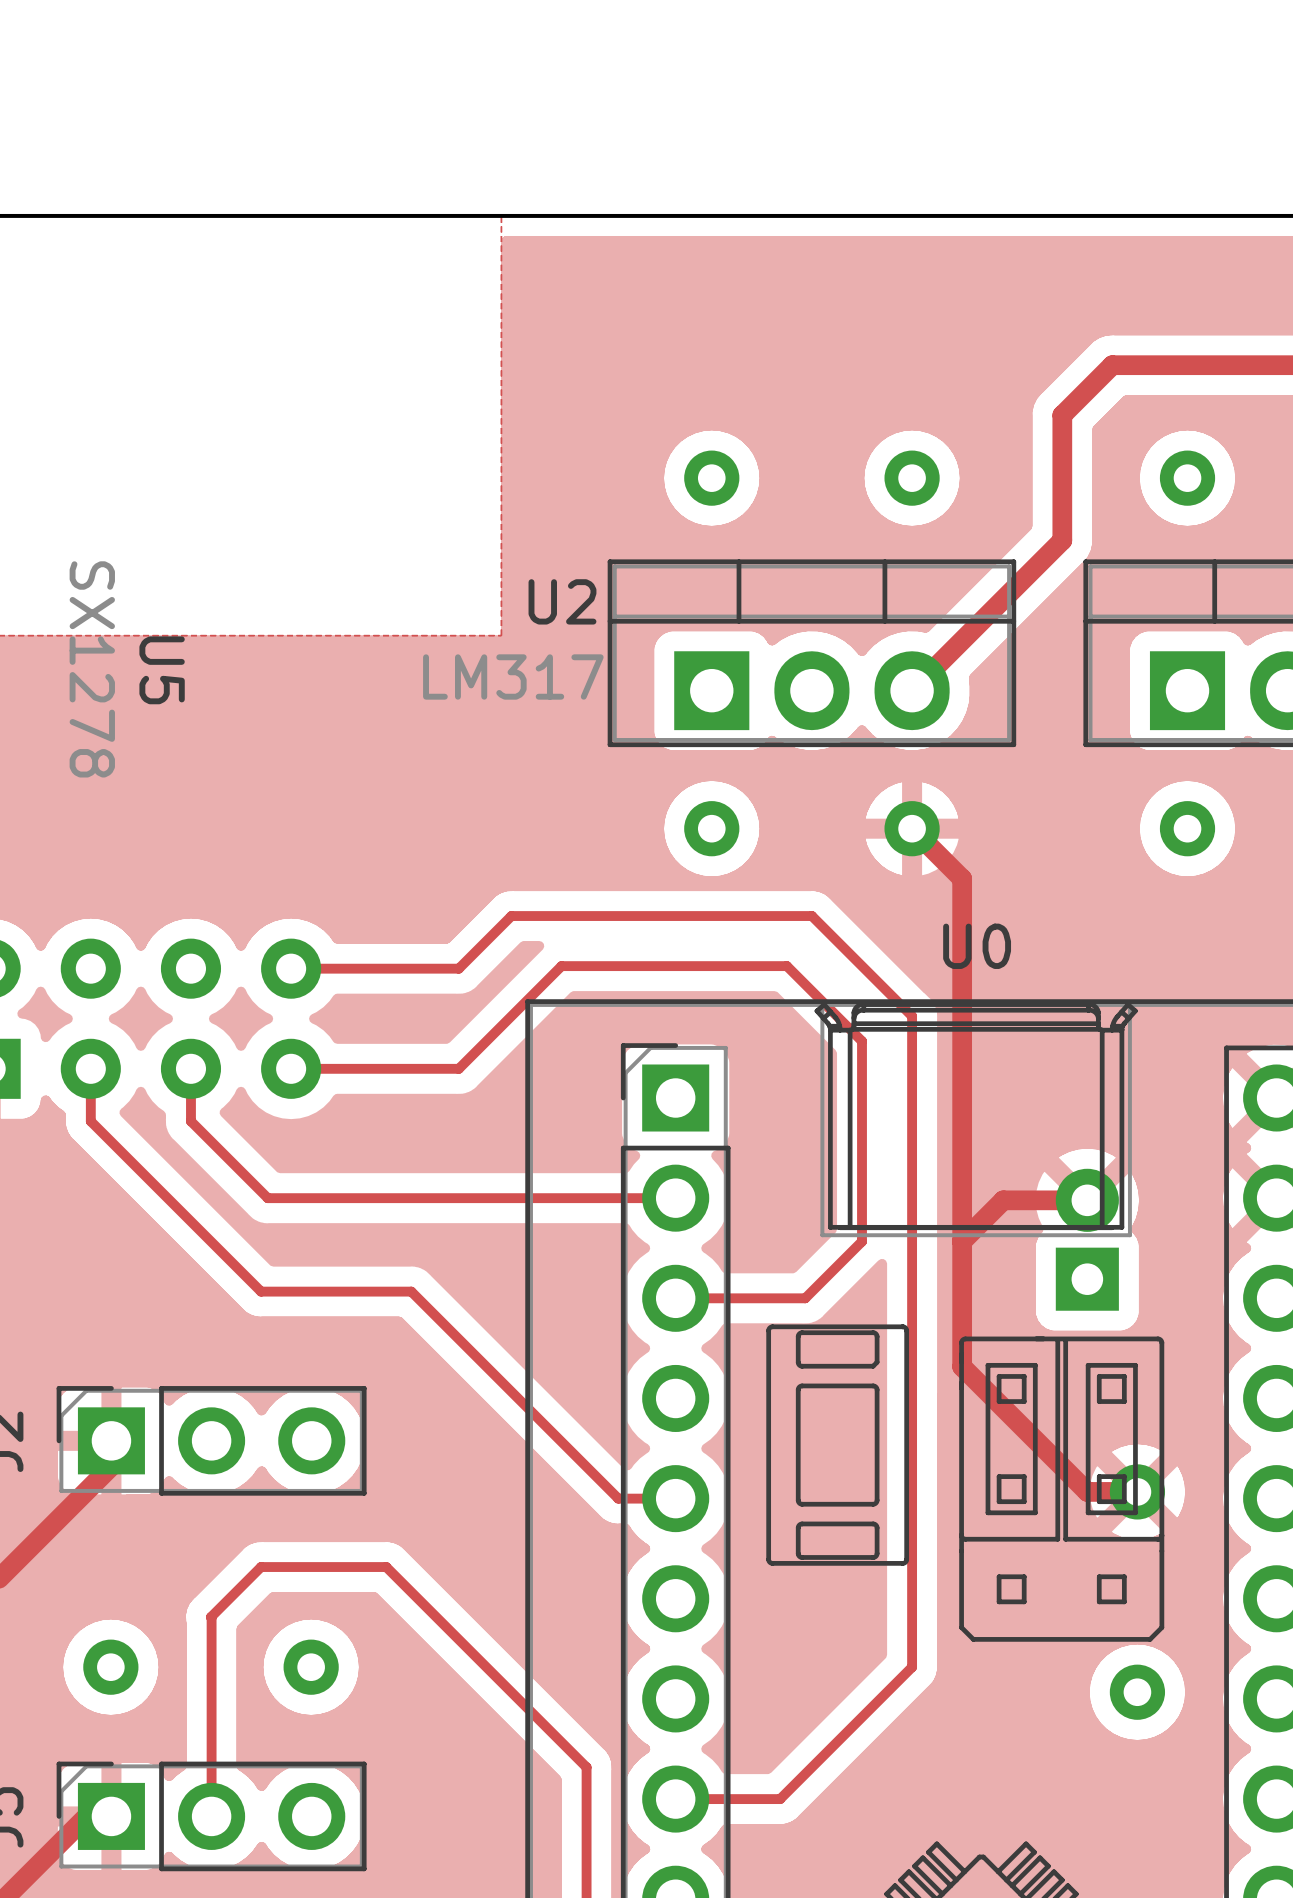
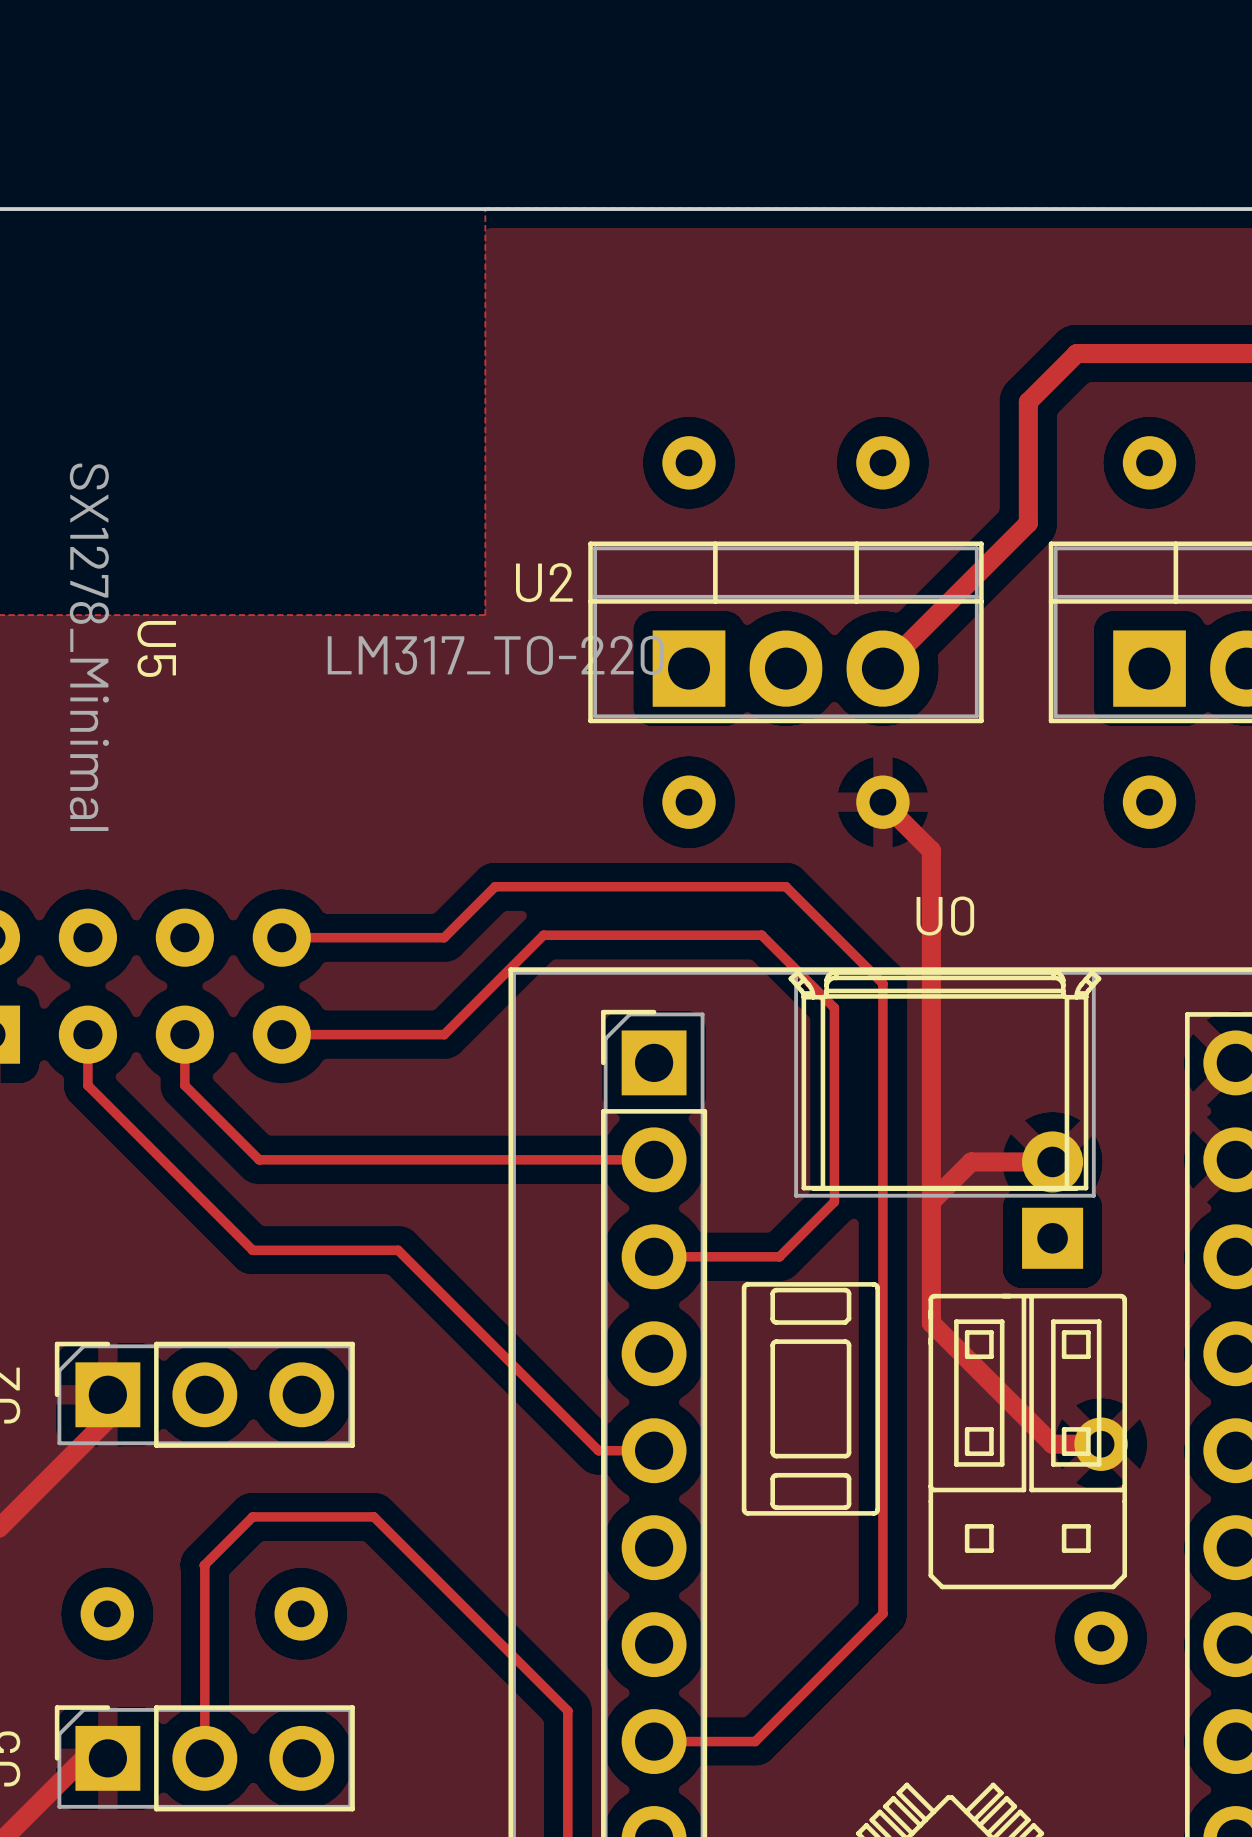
U5 value: SX1278 (92, 669) -> SX1278_Minimal (89, 647)
U2 value: LM317 (513, 676) -> LM317_TO-220 (495, 655)

